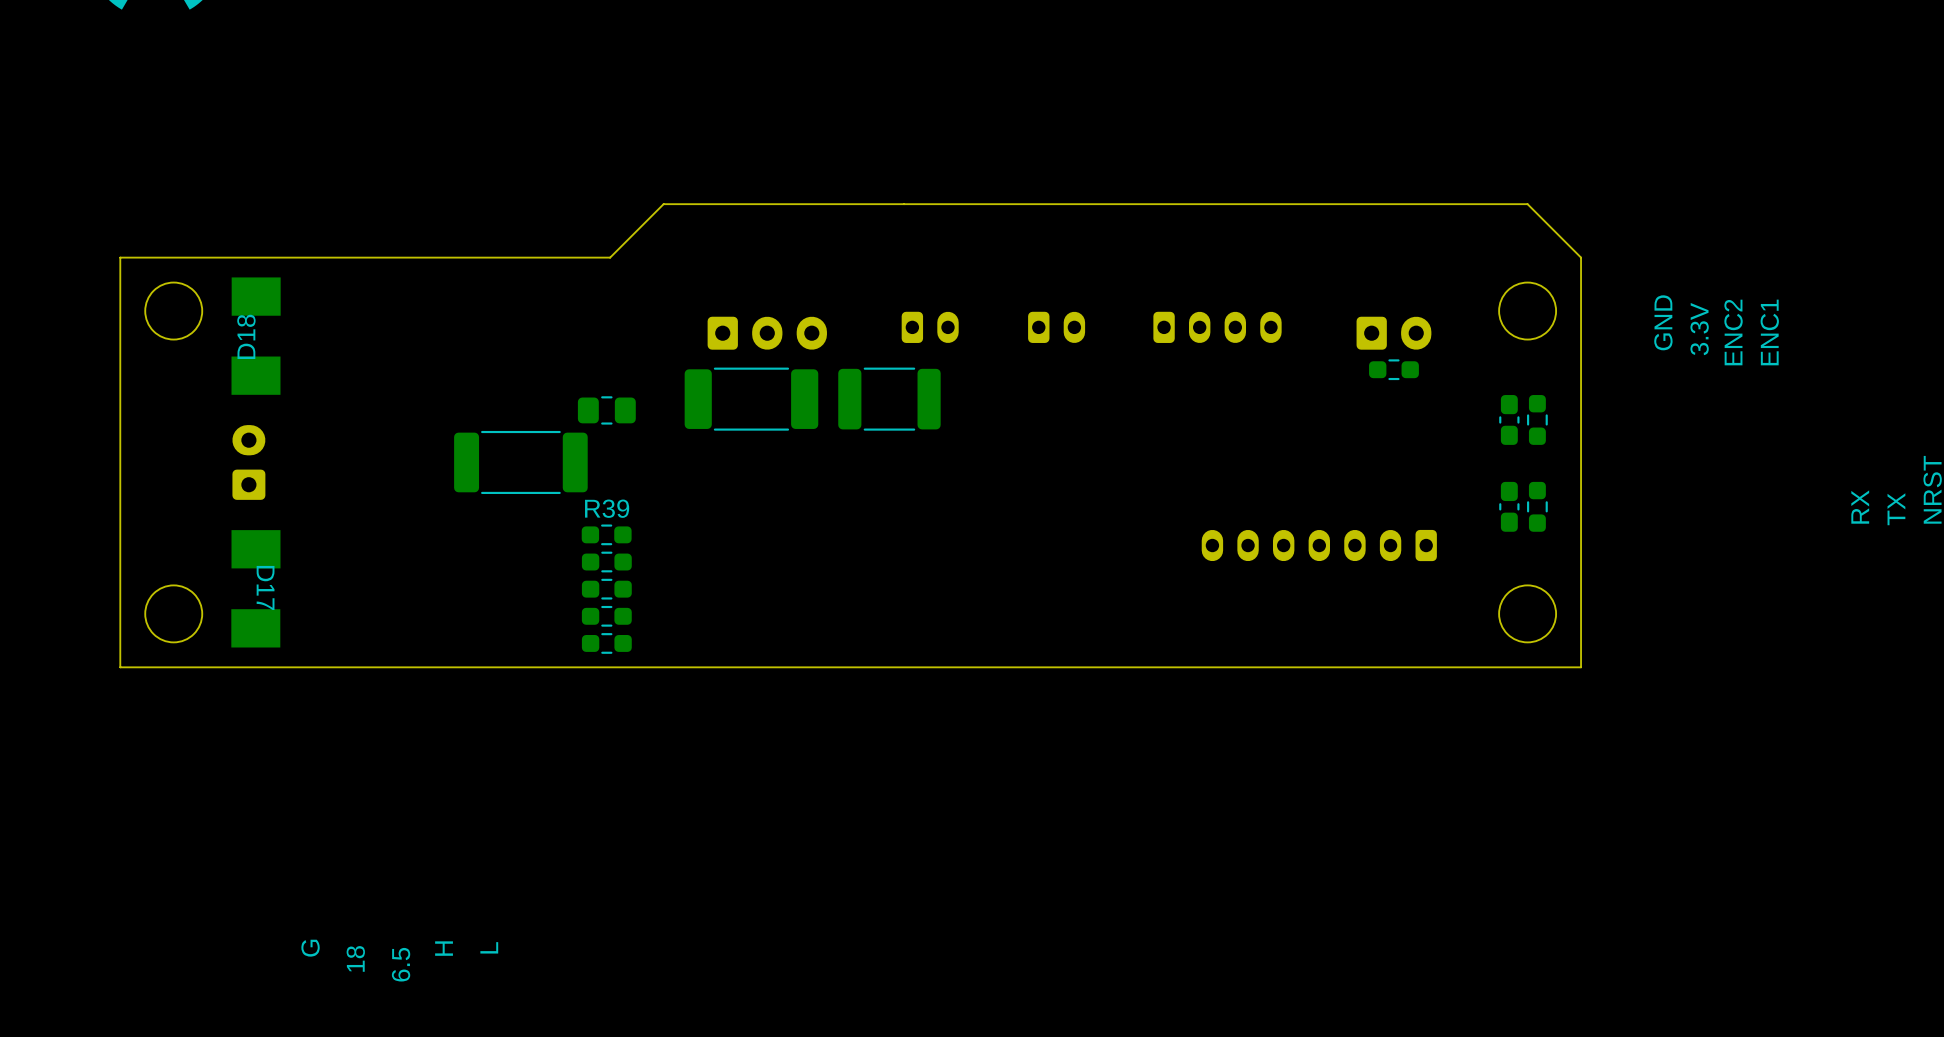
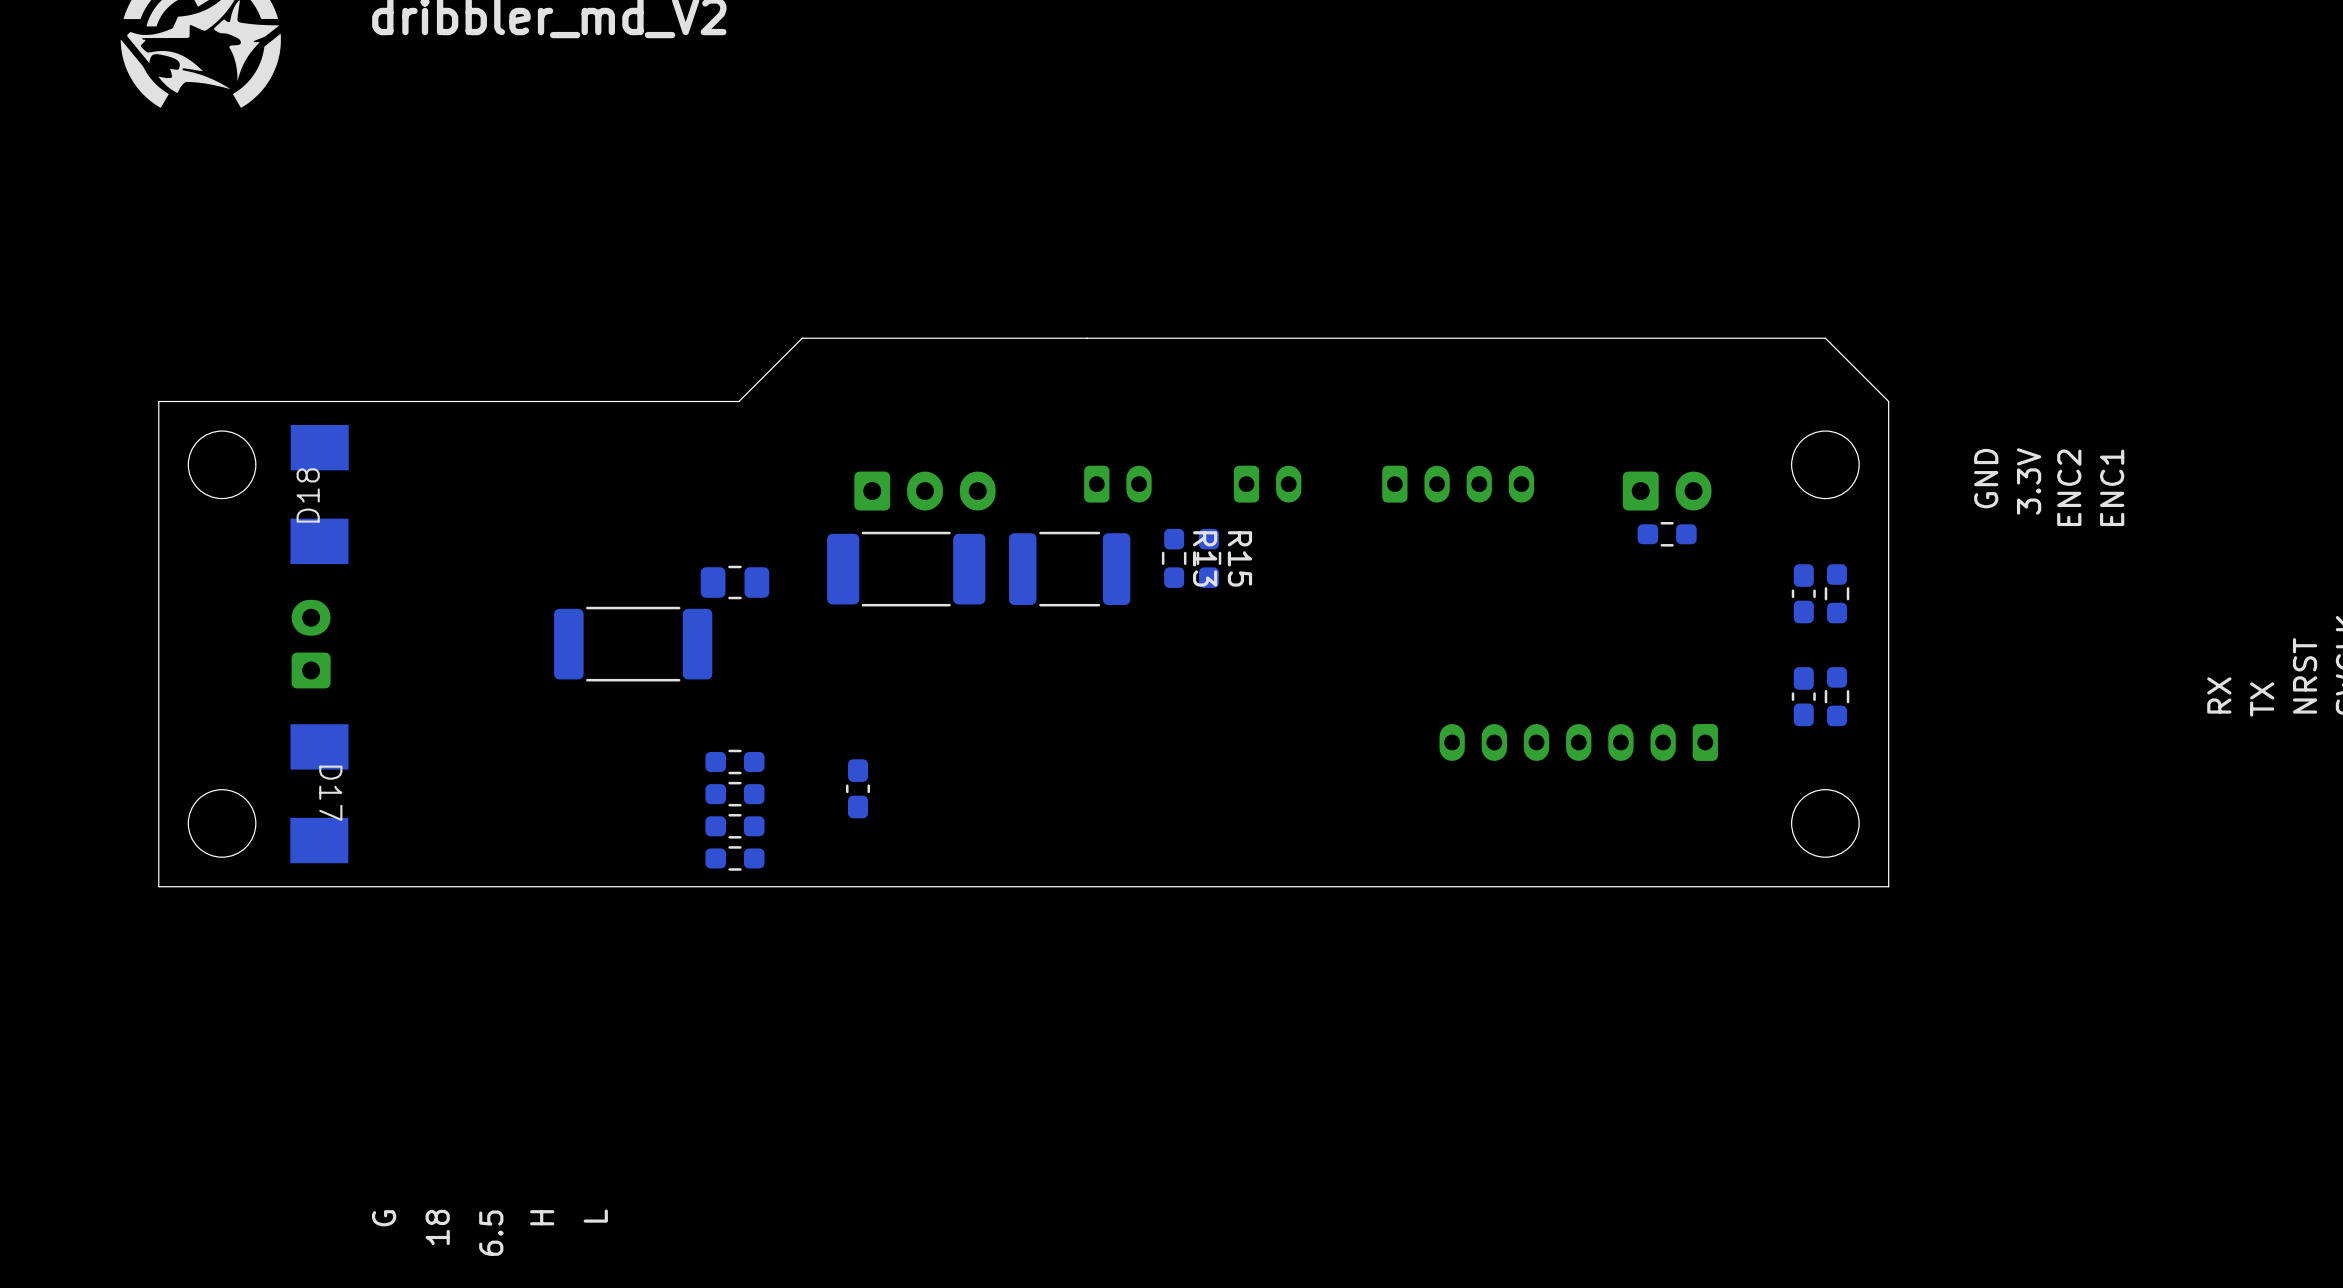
R13: none -> (1174, 558)
R15: none -> (1208, 558)
R39: (606, 534) -> none
part: none -> (858, 788)

